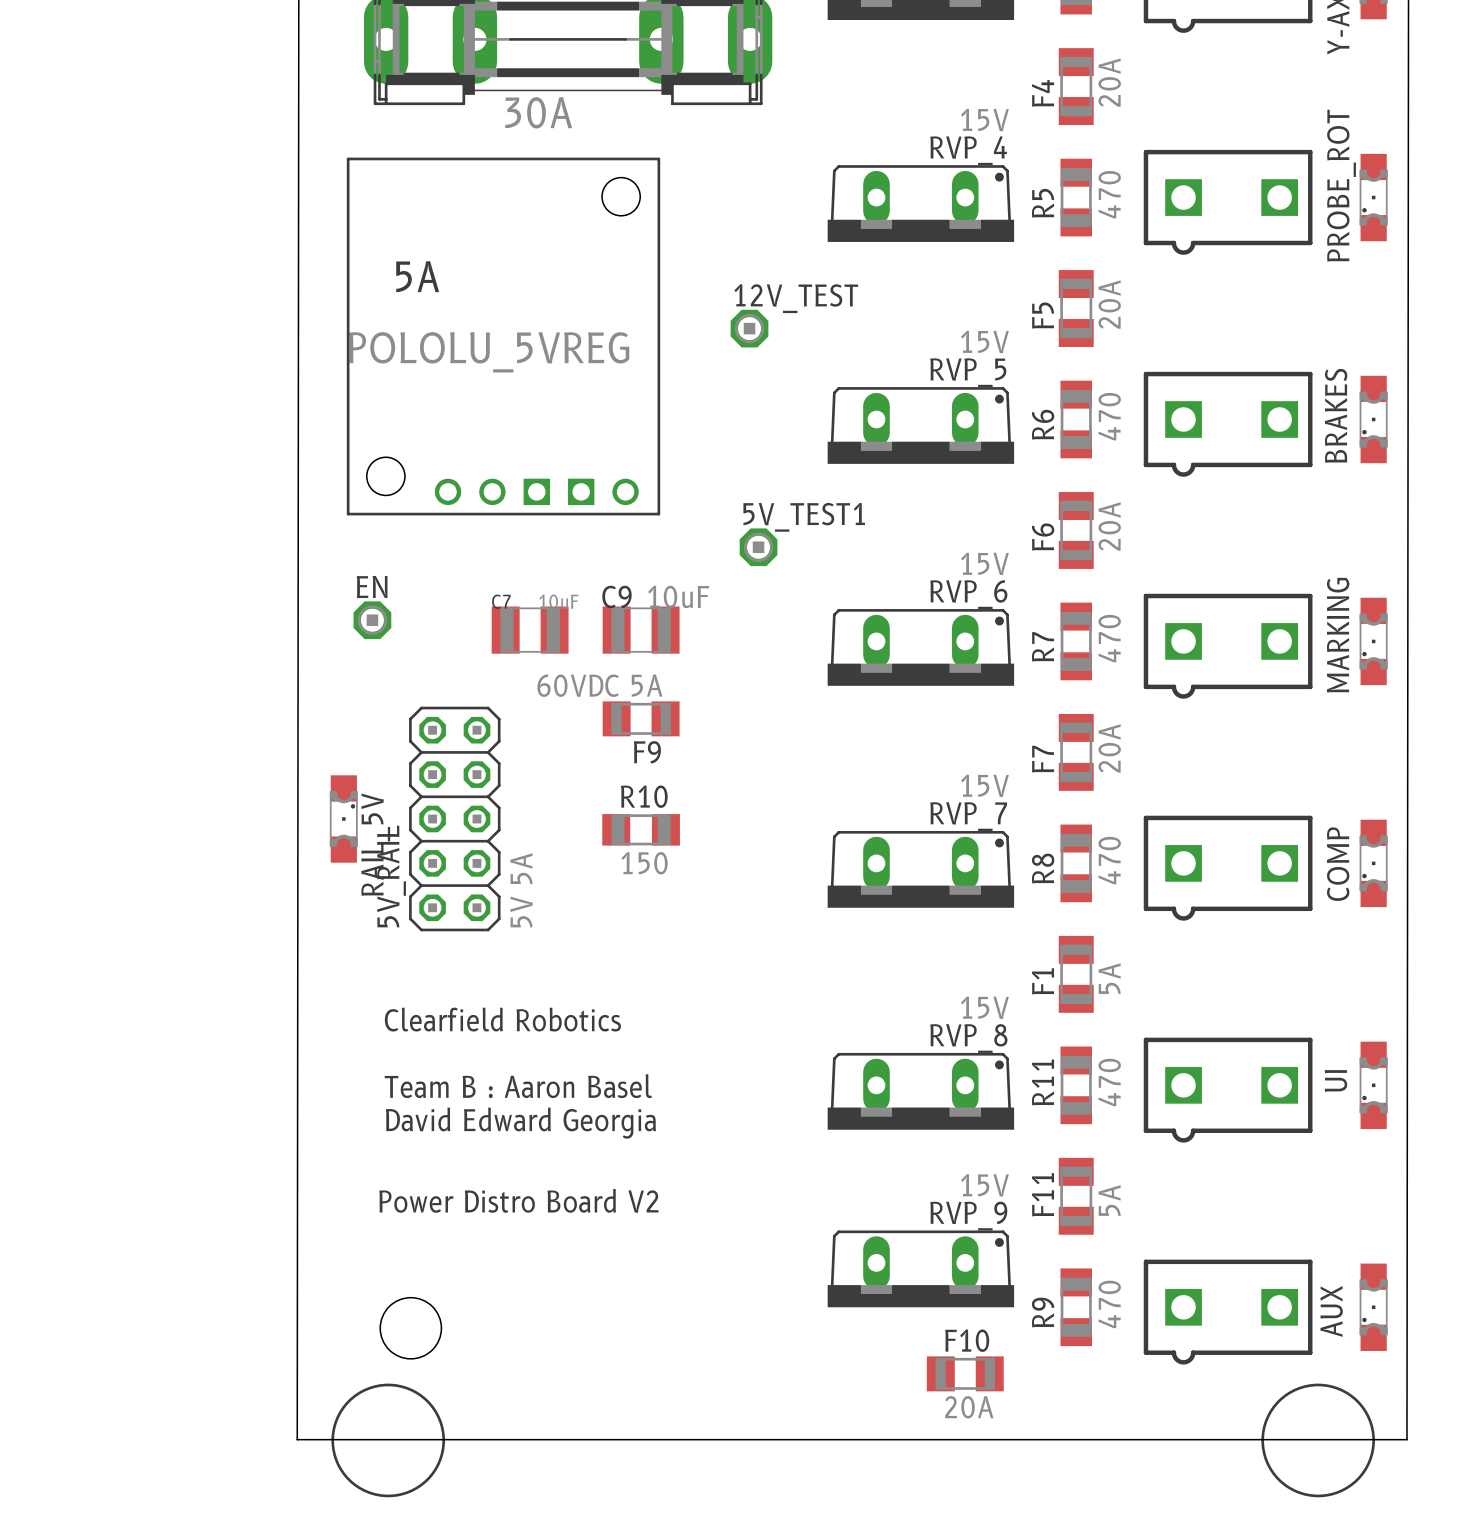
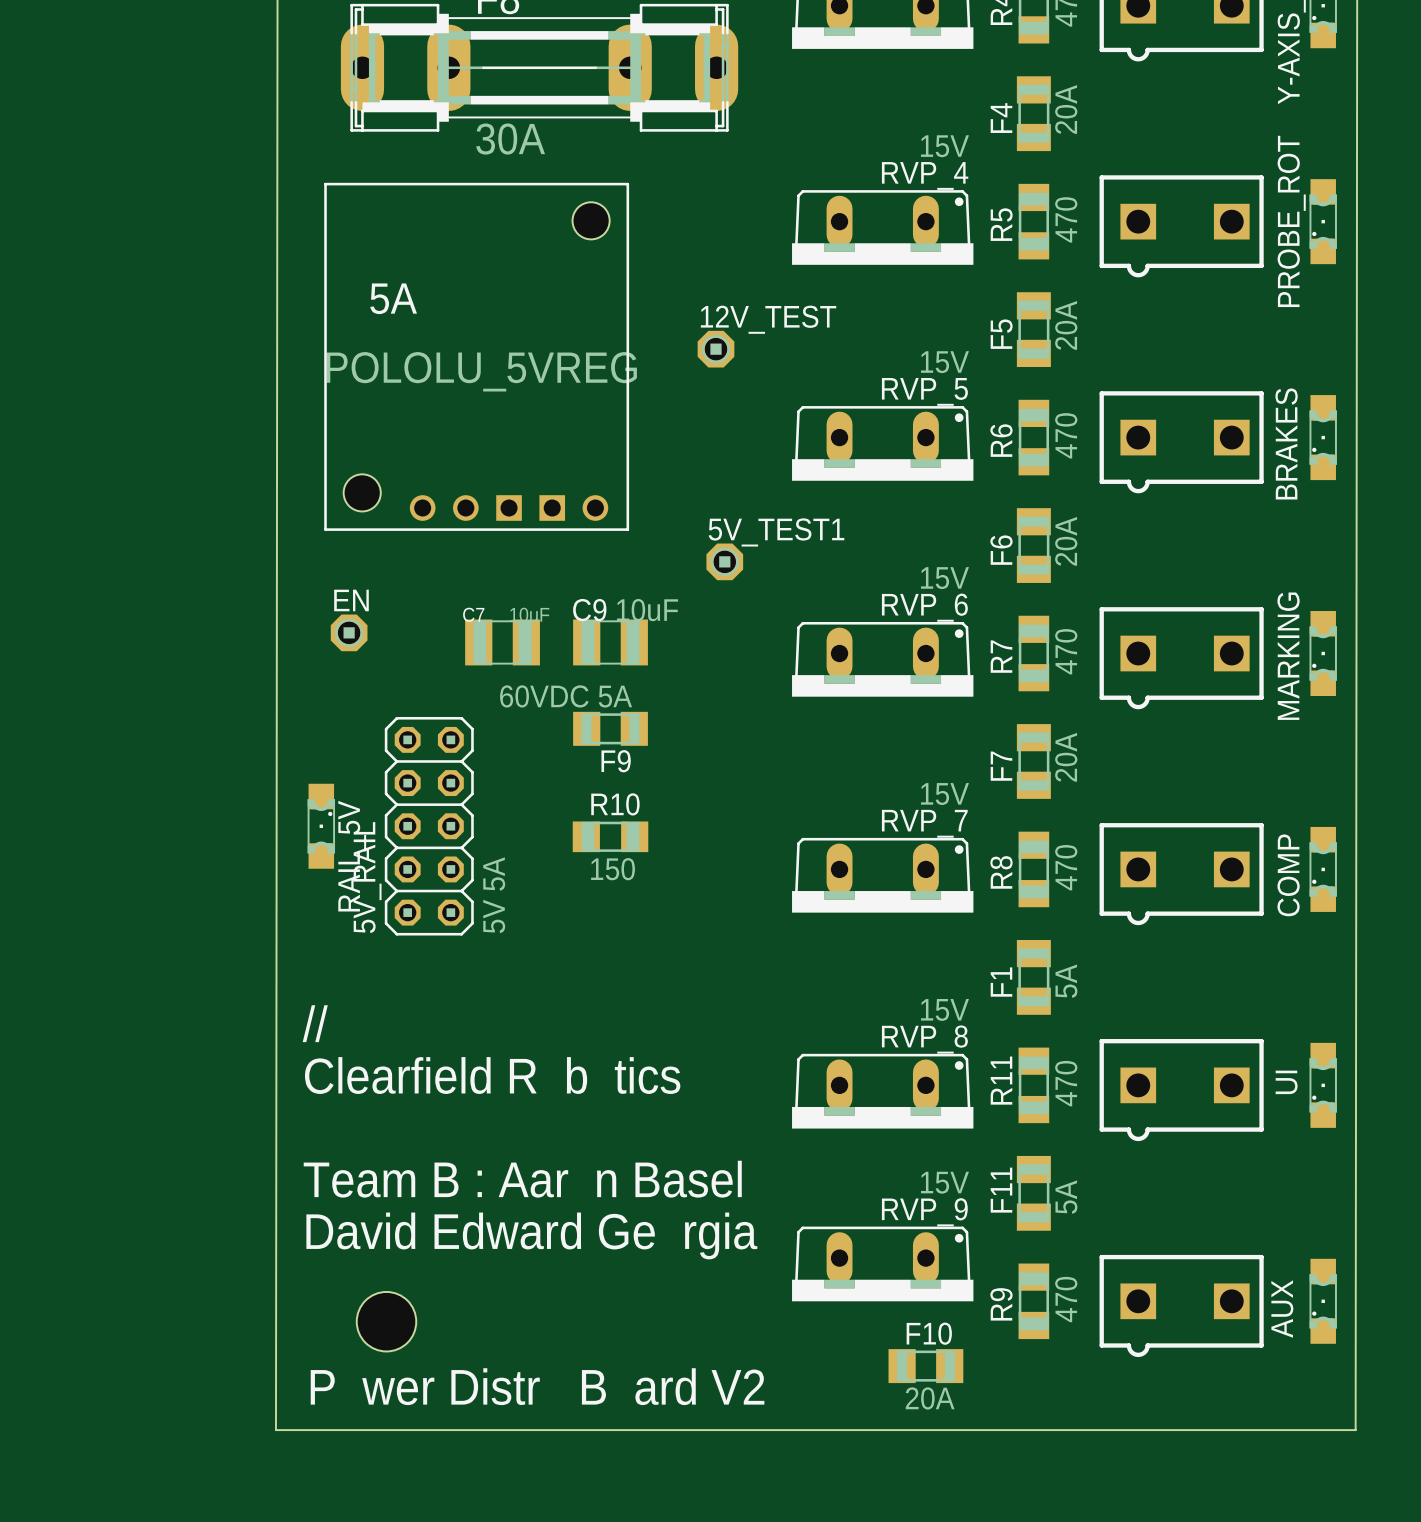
text: Clearfield Robotics (502, 1019) -> Clearfield R b tics (492, 1075)
text: none -> // (315, 1023)
text: Team B : Aaron Basel (518, 1086) -> none
text: David Edward Georgia (520, 1123) -> none
text: none -> Team B : Aar n Basel (522, 1179)
text: Power Distro Board V2 (518, 1200) -> none
text: none -> David Edward Ge rgia (531, 1235)
drawing: [331, 1383, 446, 1498] -> none
drawing: [1261, 1383, 1375, 1498] -> none
text: none -> P wer Distr B ard V2 (537, 1386)

